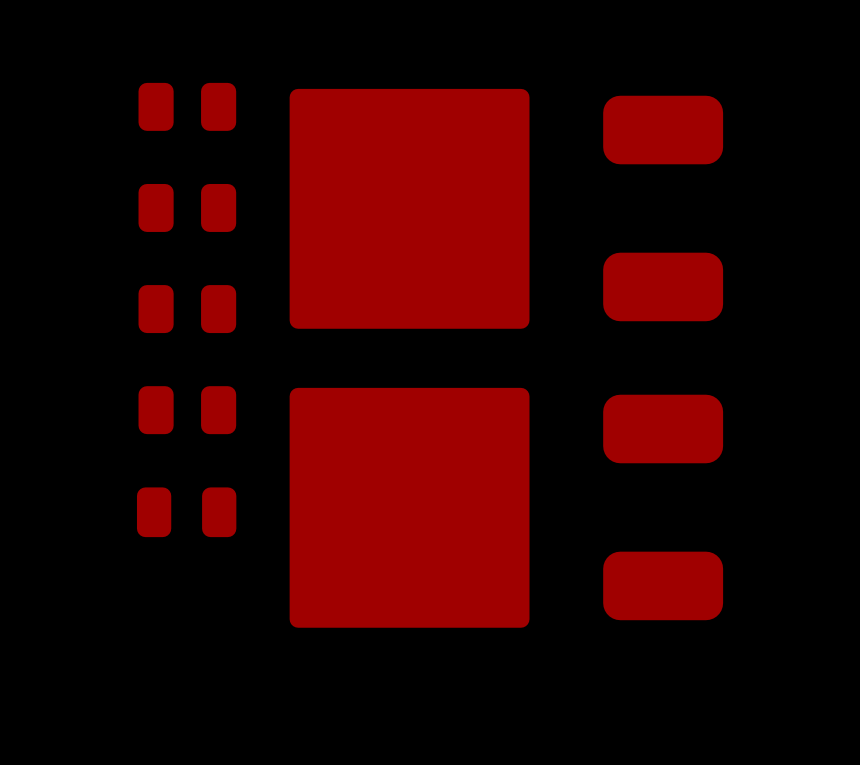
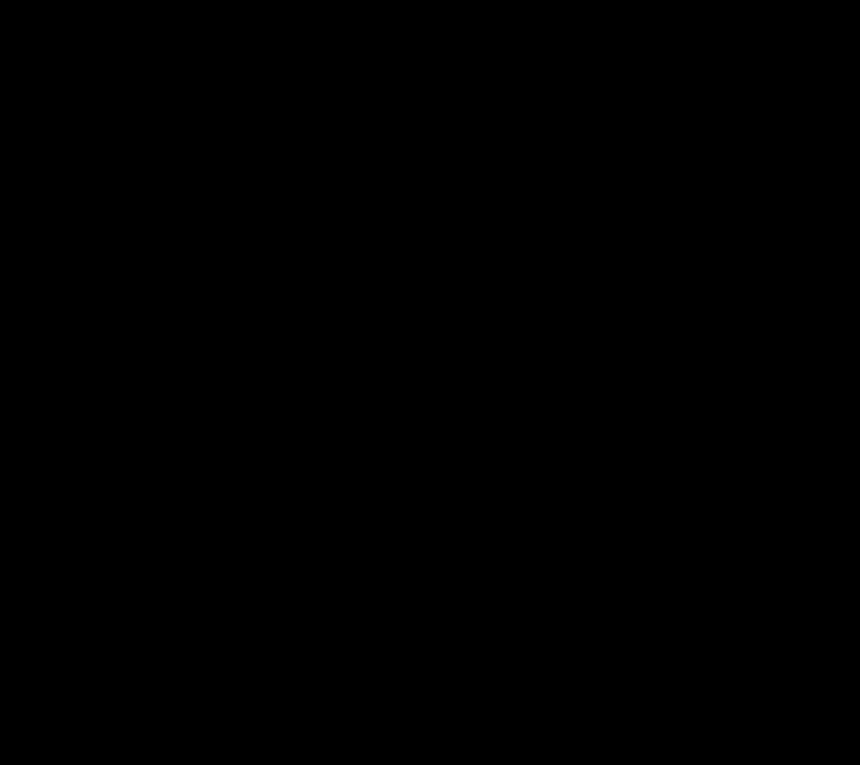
part: (187, 106) -> none
part: (187, 207) -> none
part: (506, 208) -> none
part: (187, 309) -> none
part: (187, 410) -> none
part: (506, 507) -> none
part: (186, 512) -> none

